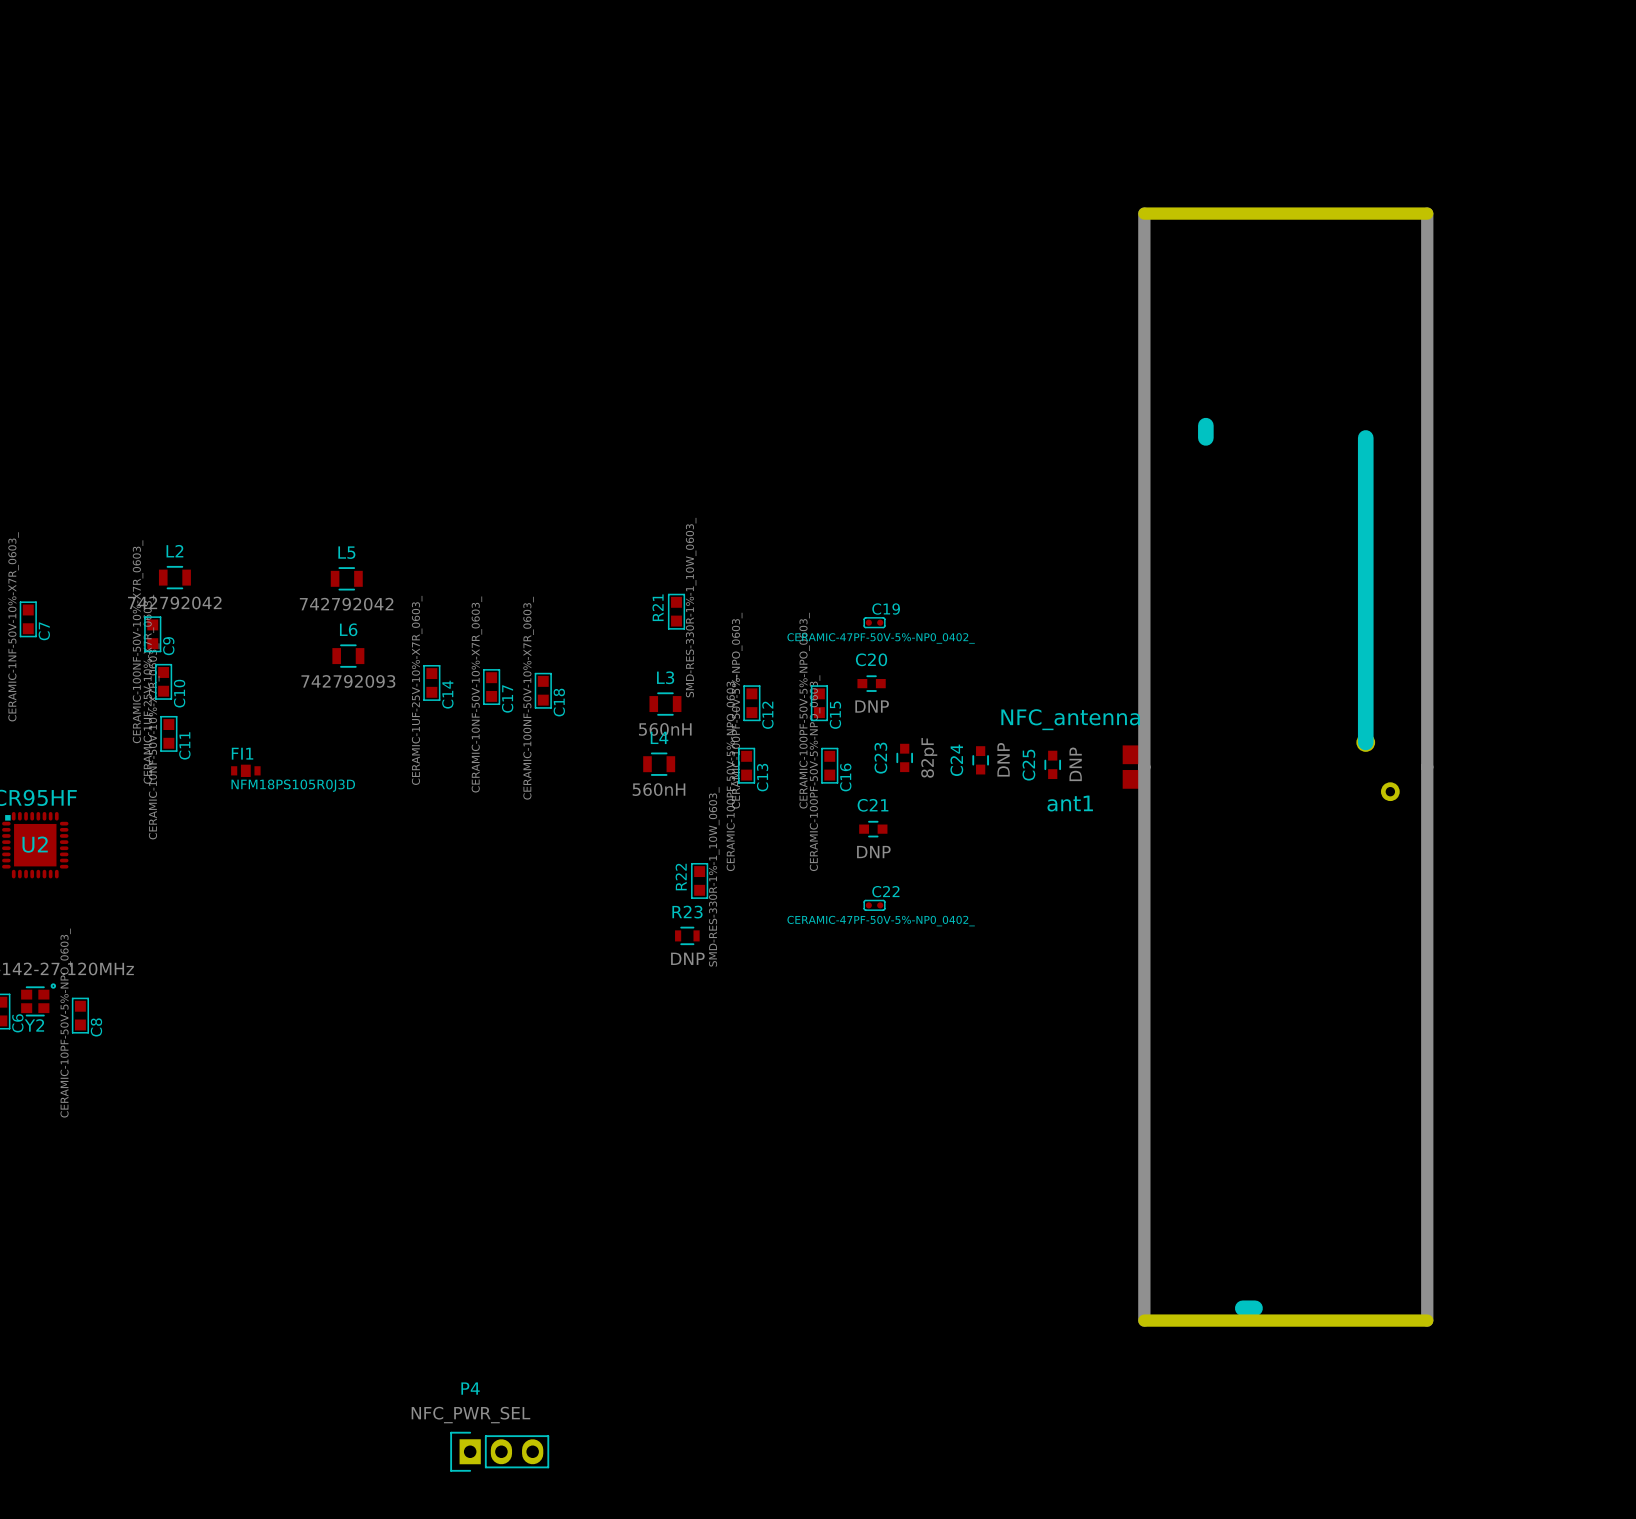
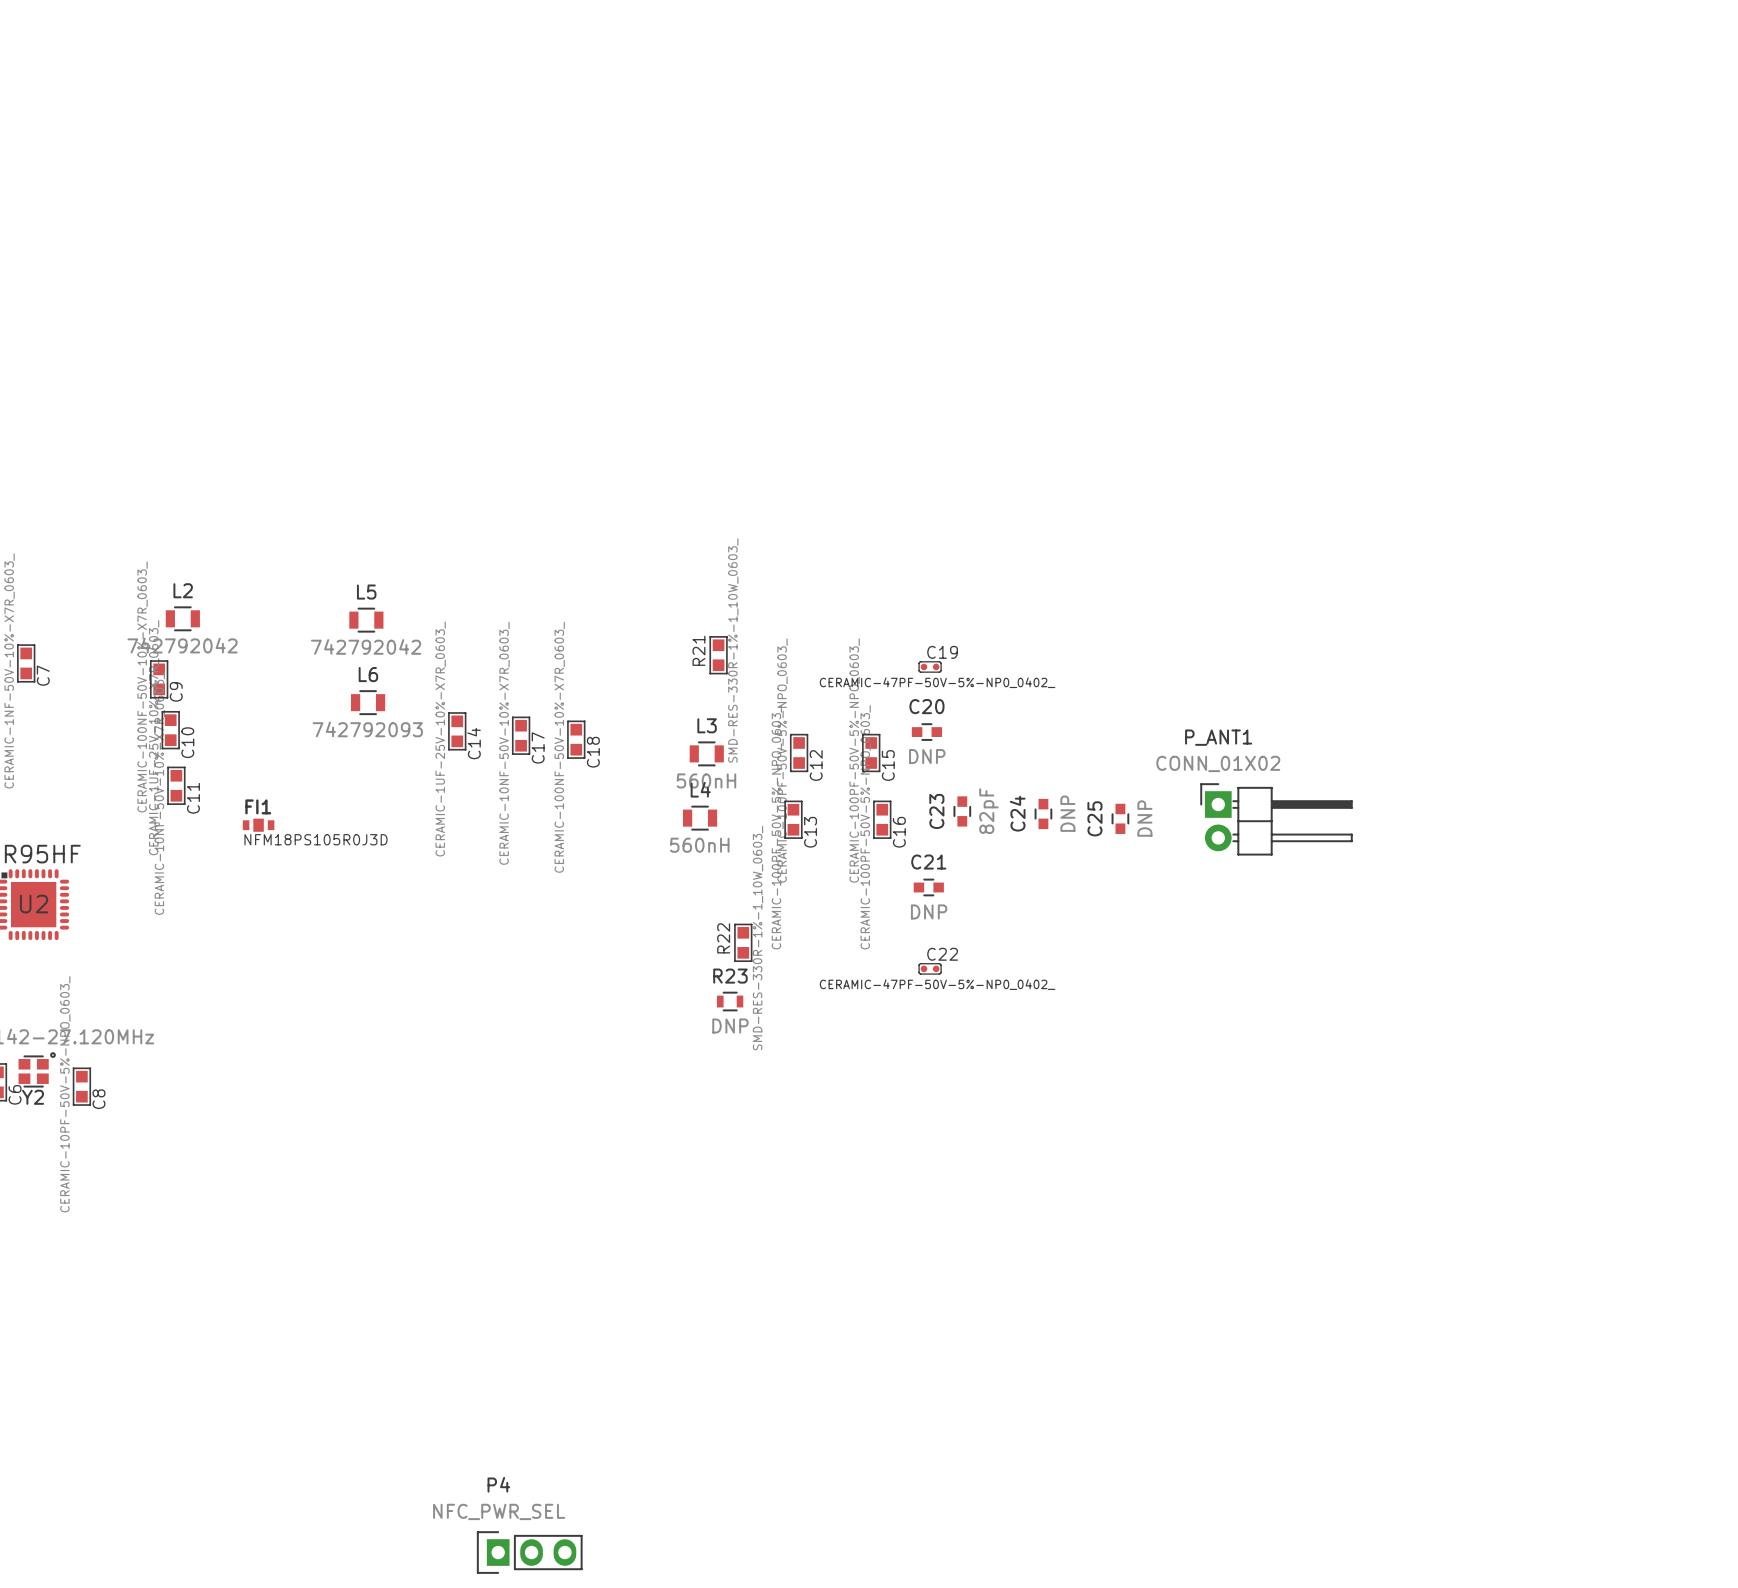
P_ANT1: none -> CONN_01X02 (1276, 819)
ant1: NFC_antenna (1278, 767) -> none

